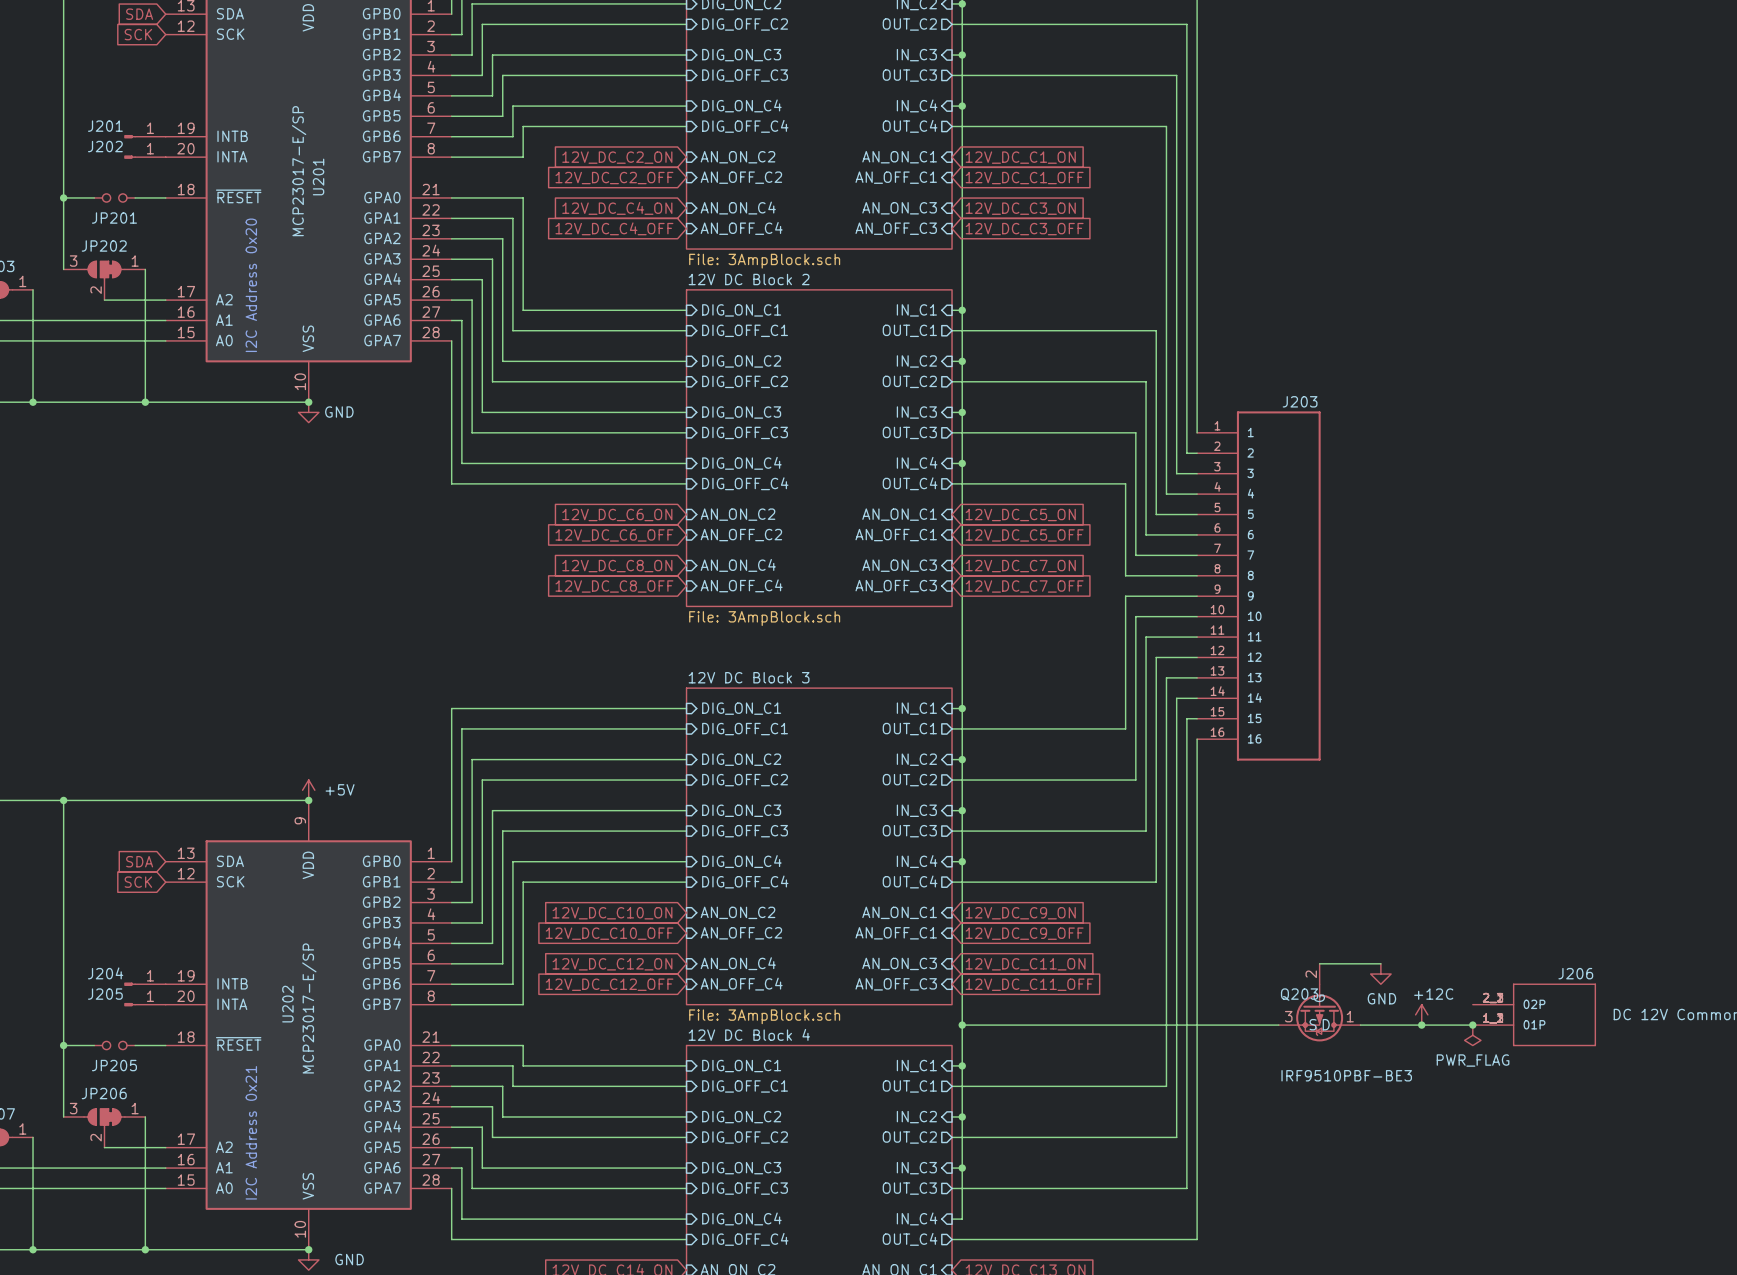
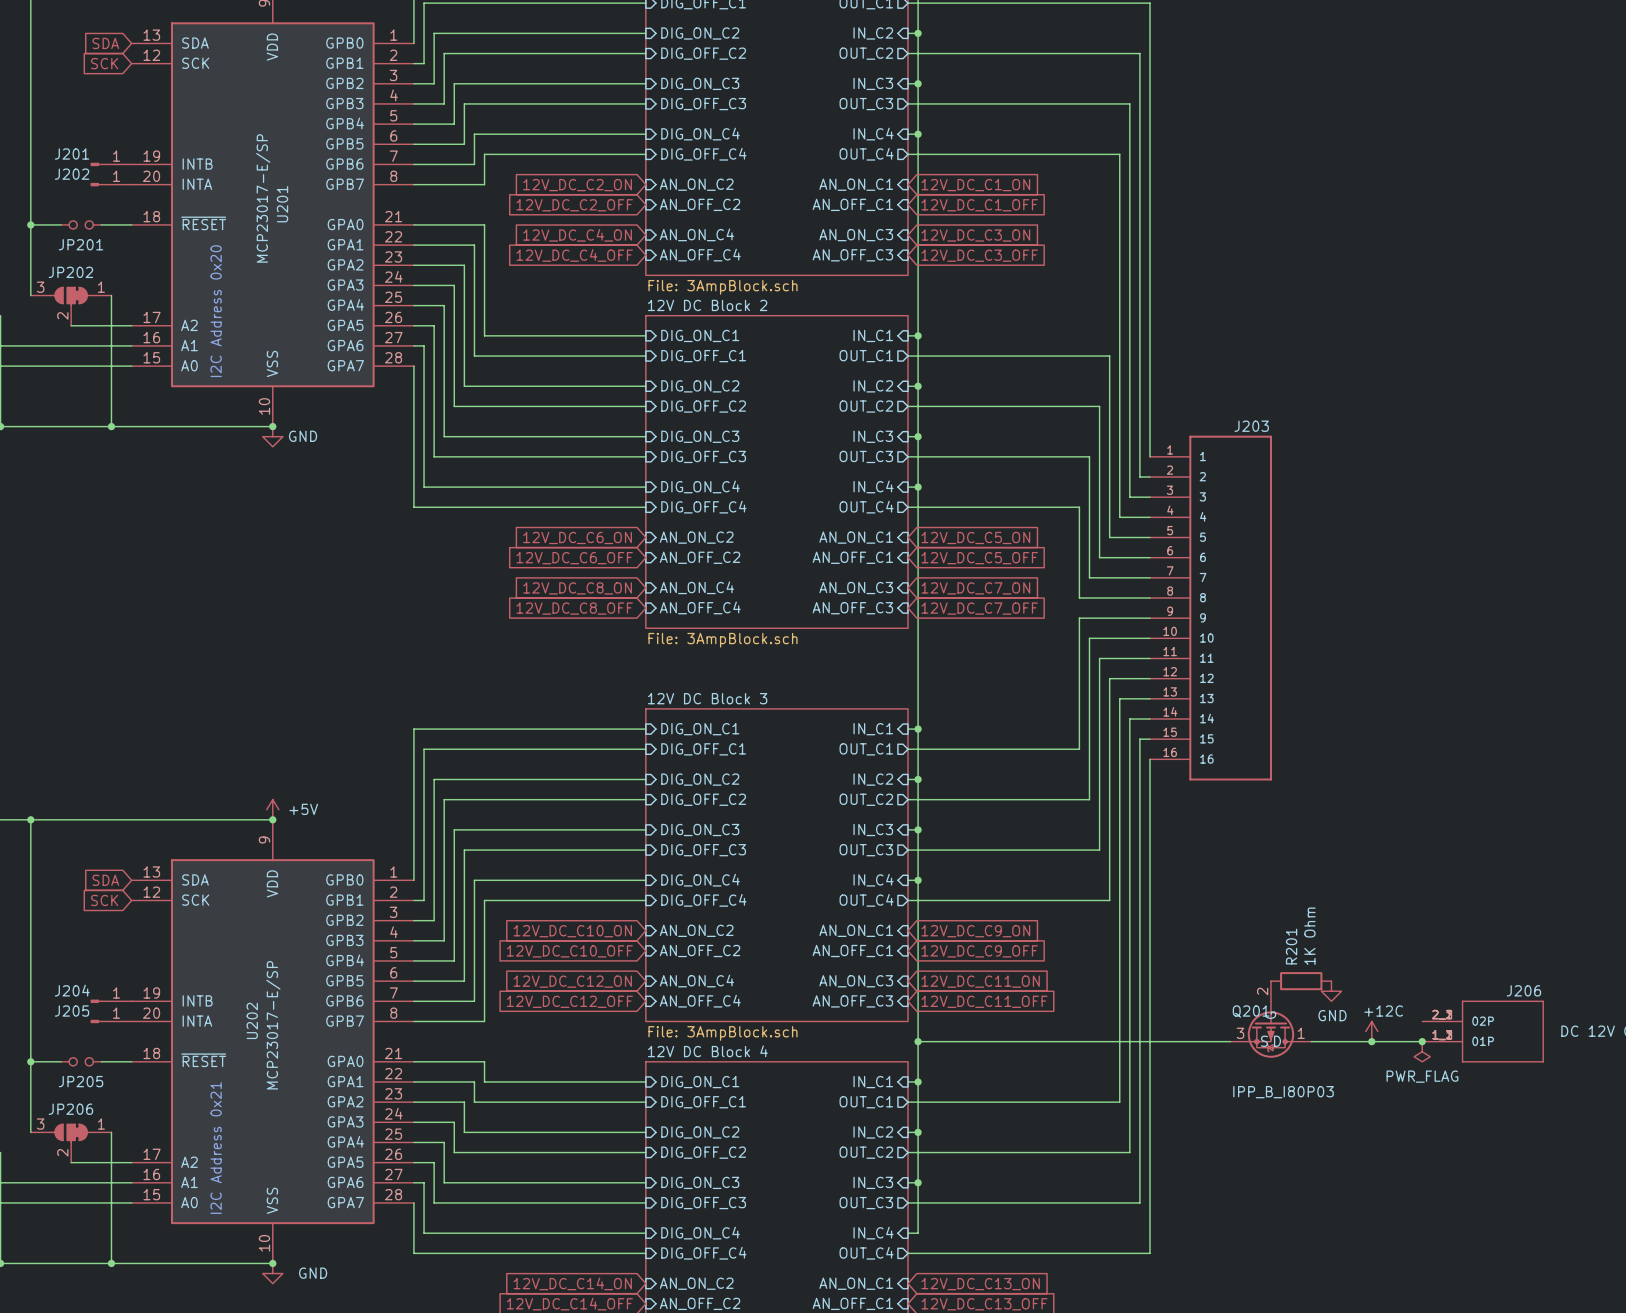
wire: (1319, 963) (1380, 963) -> none
R201: none -> 1K Ohm (1301, 981)
Q203 name: Q203 (1299, 994) -> Q201 (1251, 1011)
Q203 value: IRF9510PBF-BE3 (1346, 1075) -> IPP_B_I80P03 (1283, 1092)

